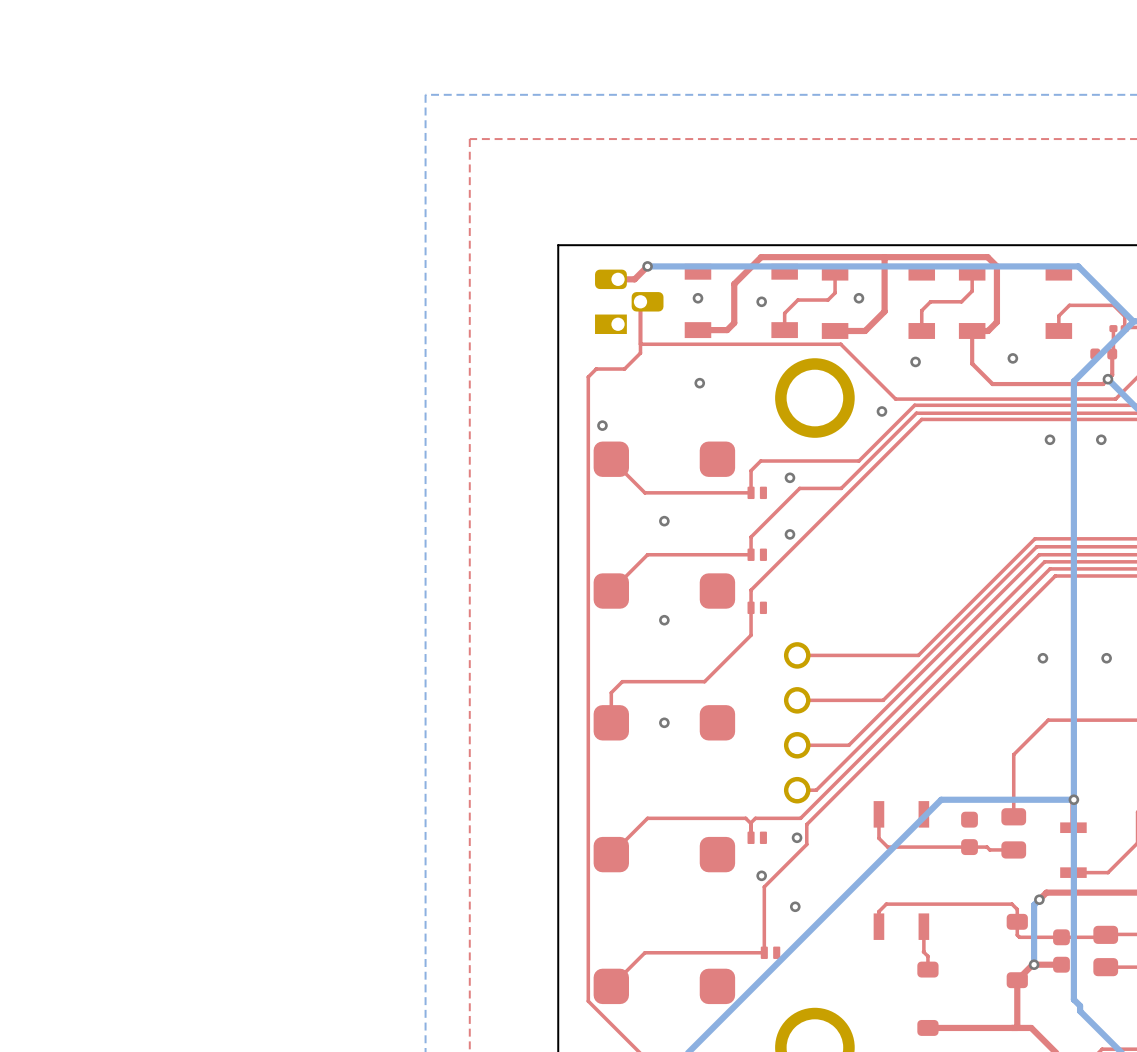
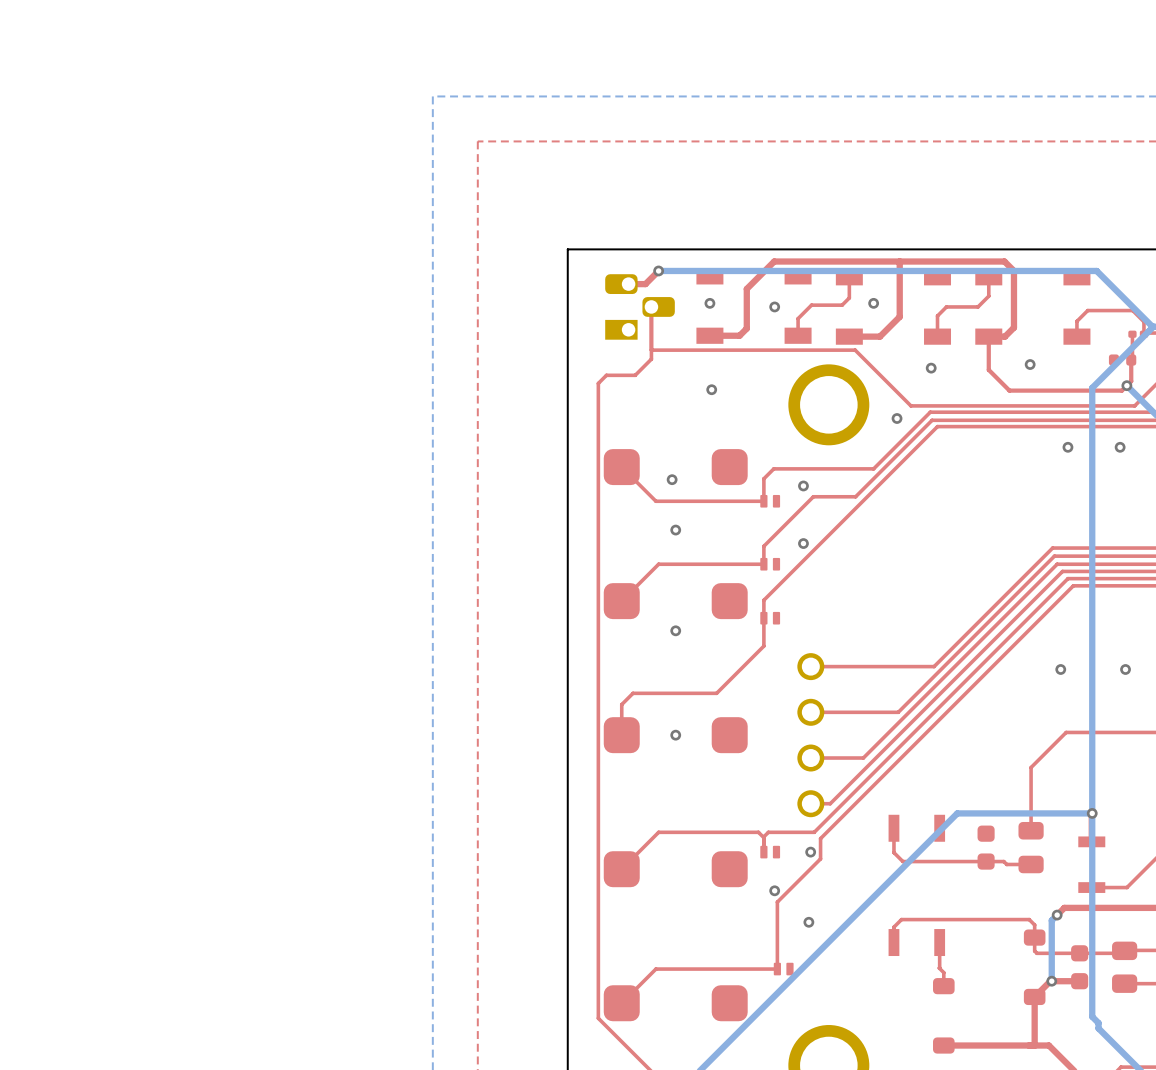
via position: (602, 425) -> (672, 479)

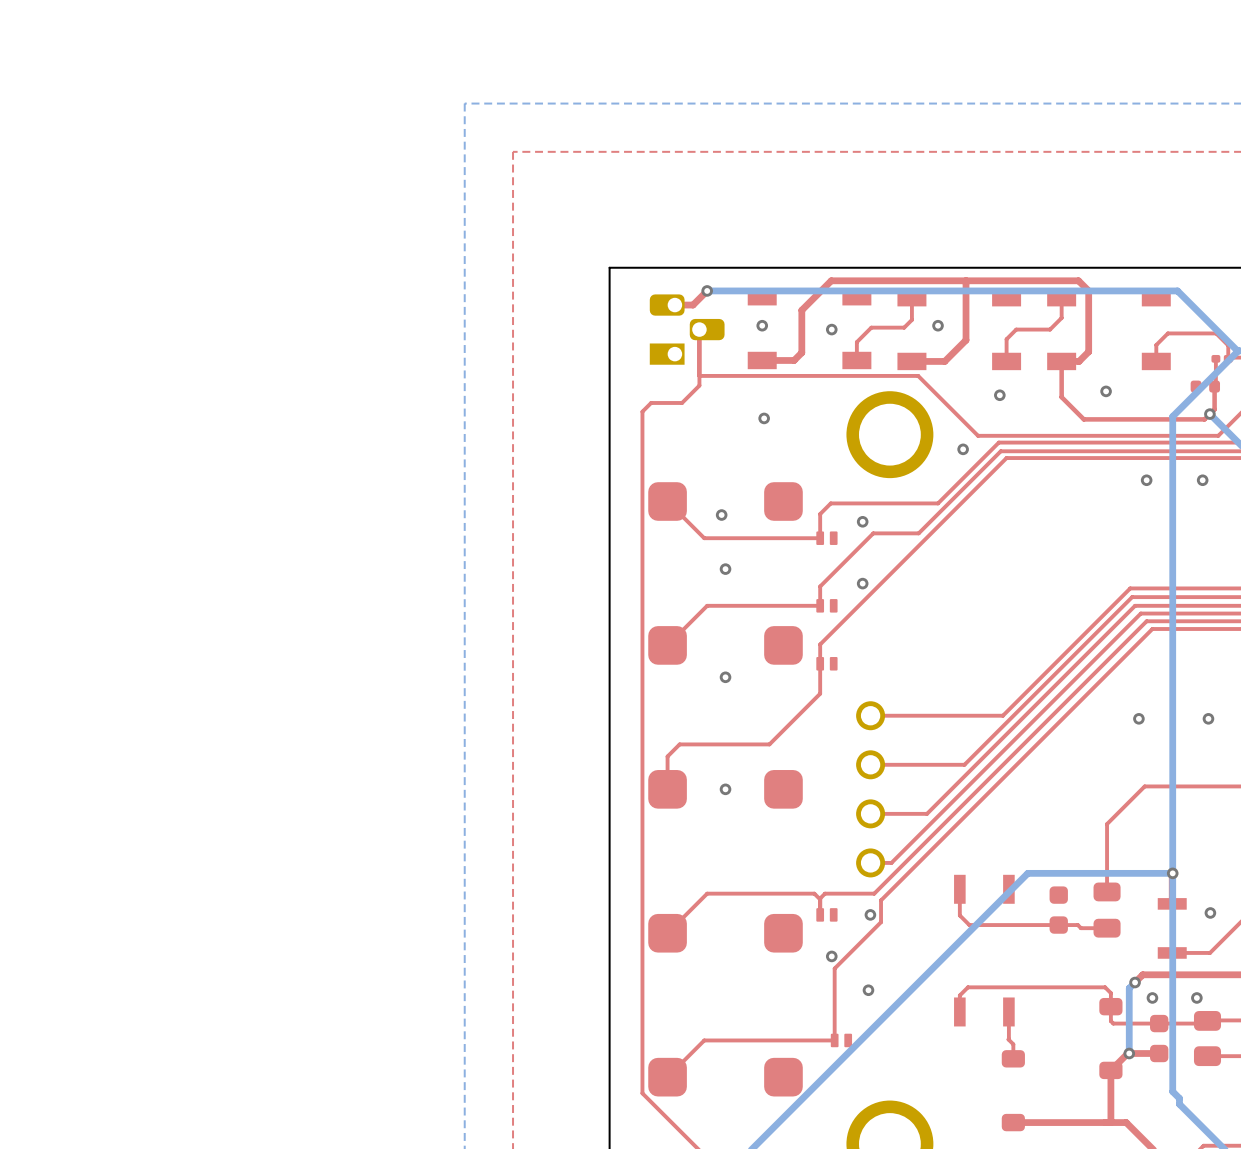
via: none -> (1210, 912)
via: none -> (1152, 997)
via: none -> (1196, 997)

